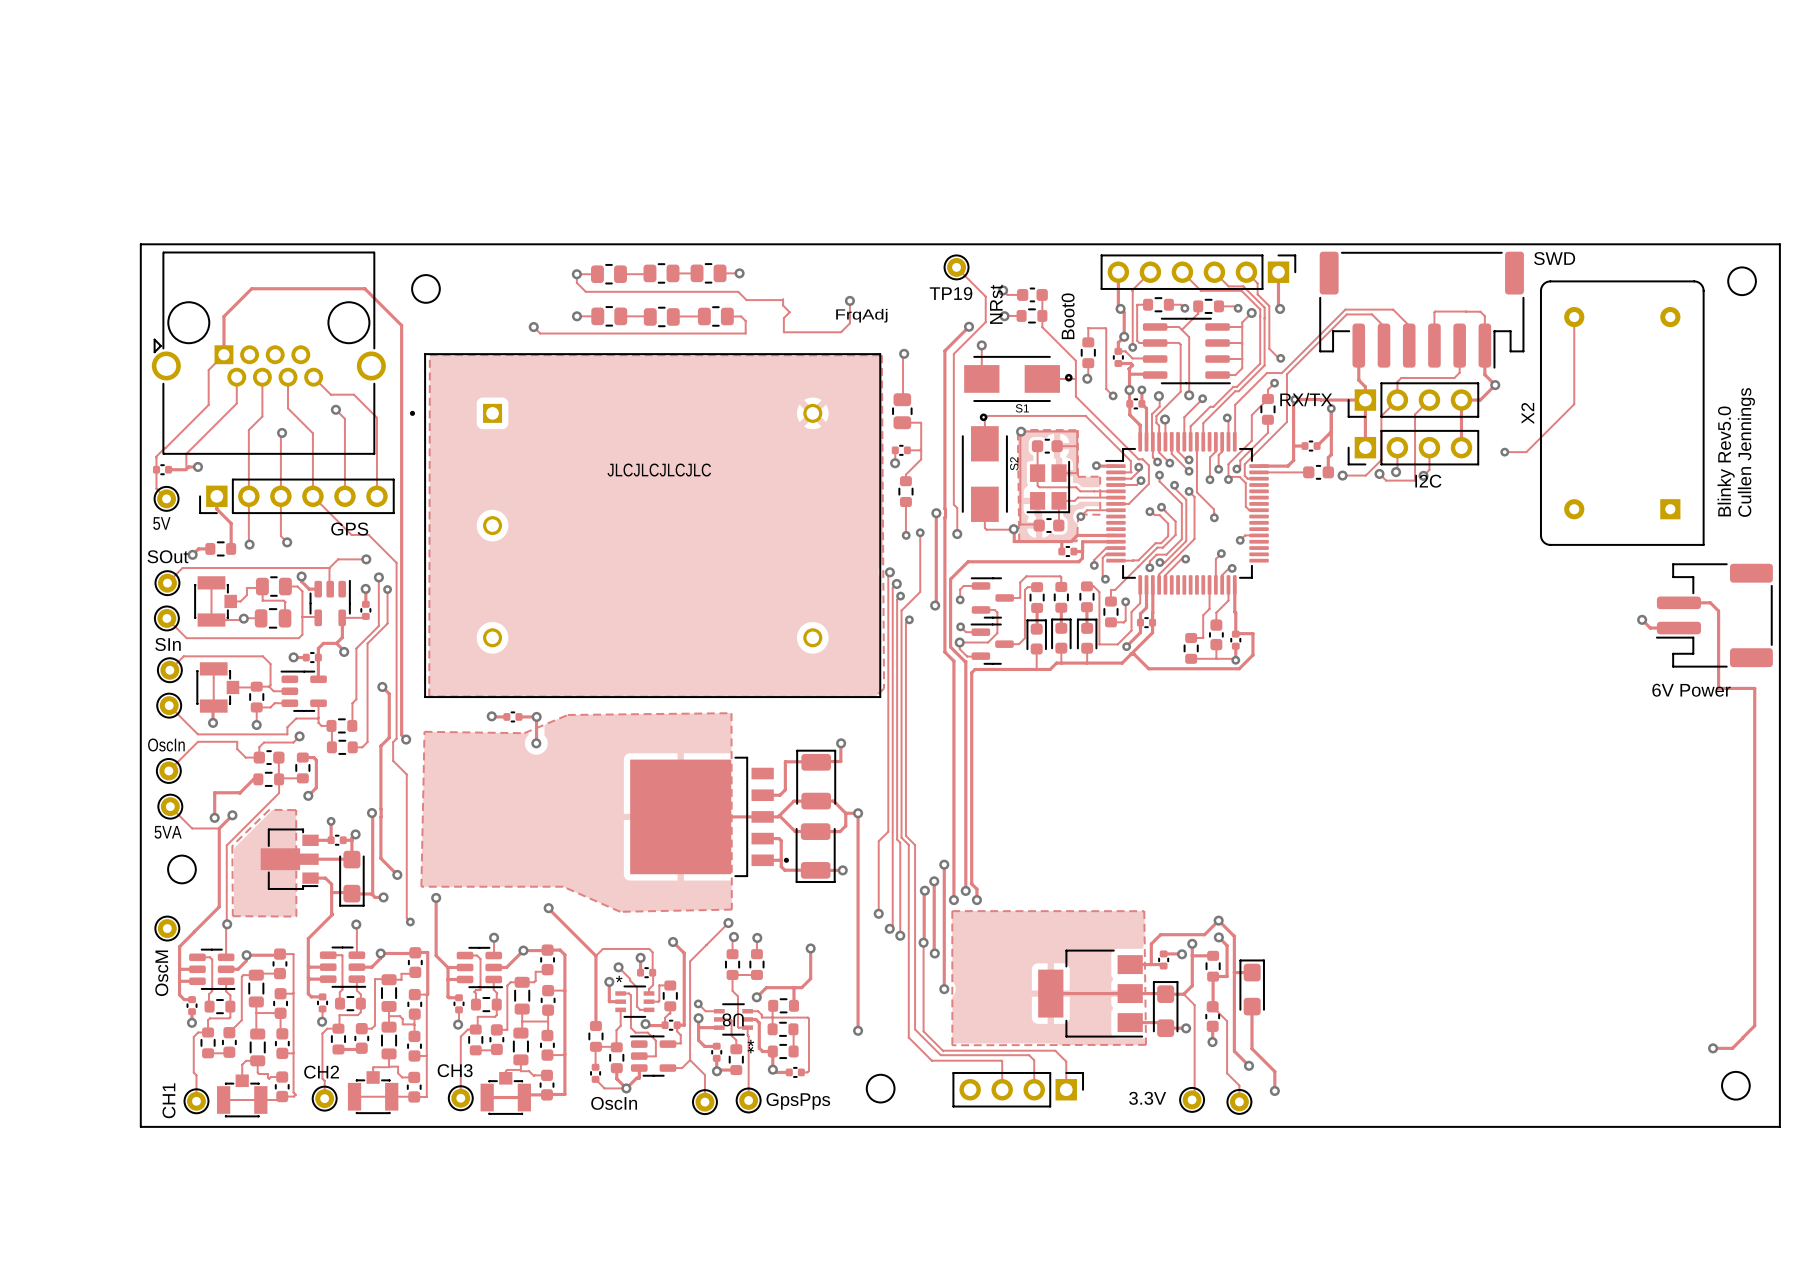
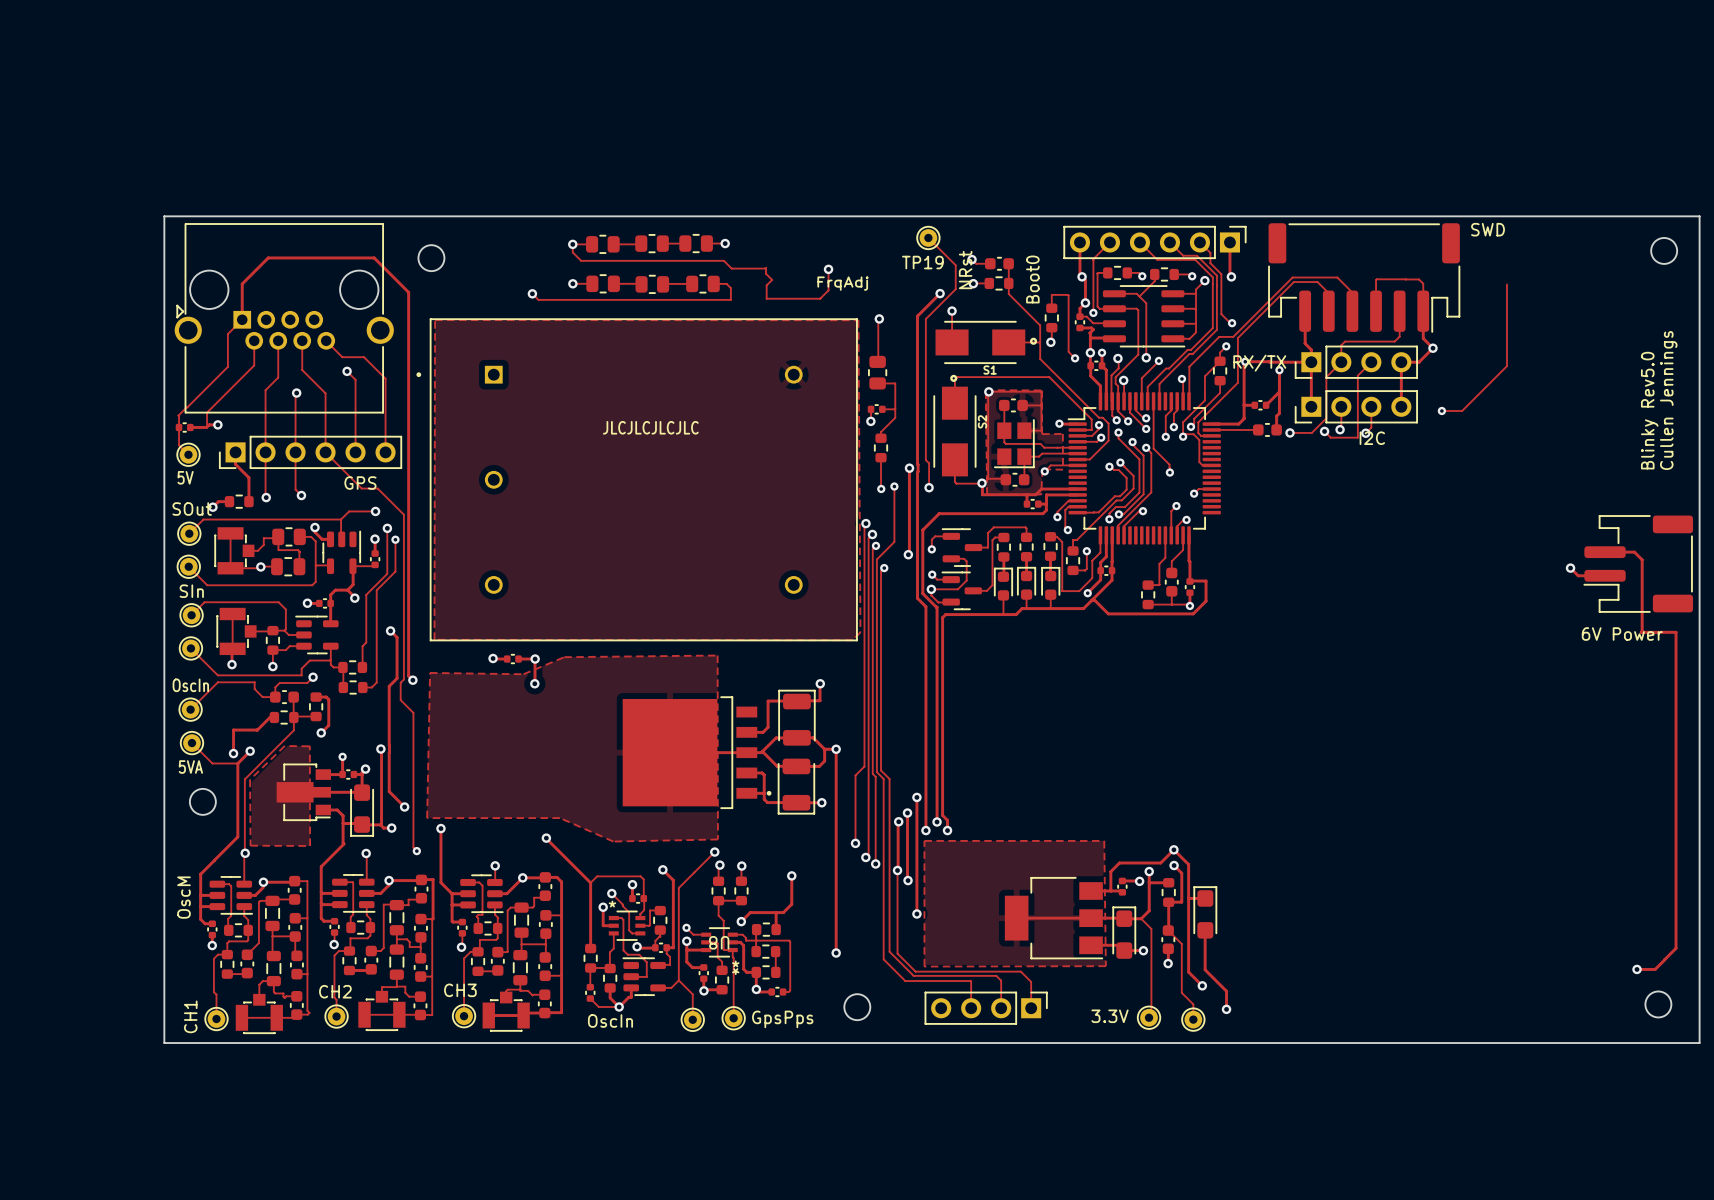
X2: (1622, 413) -> none
part: (167, 928) -> none

